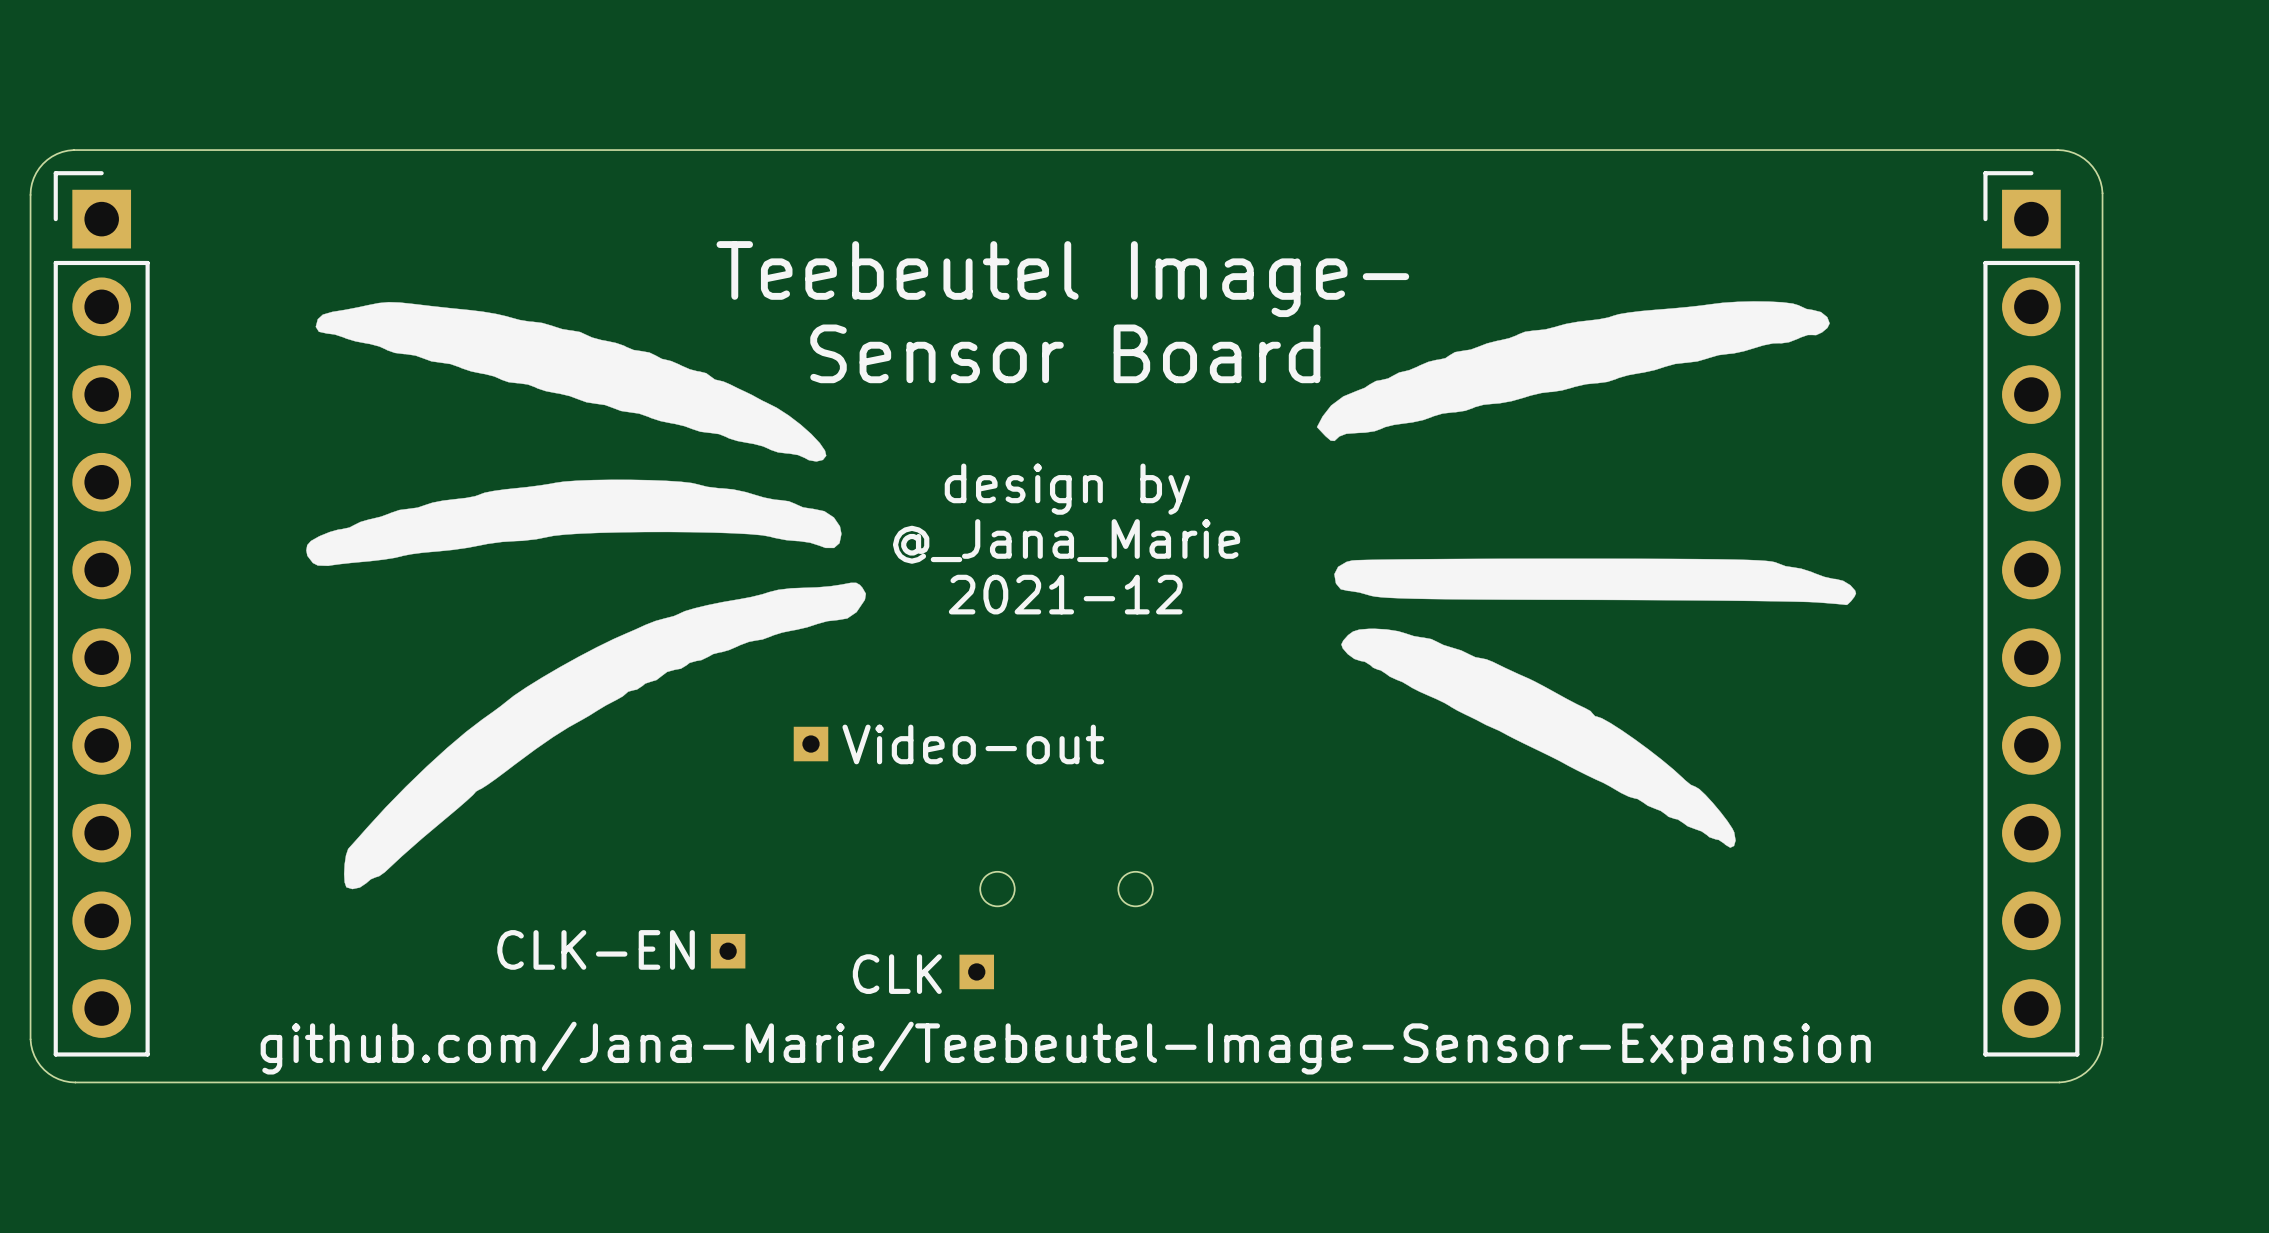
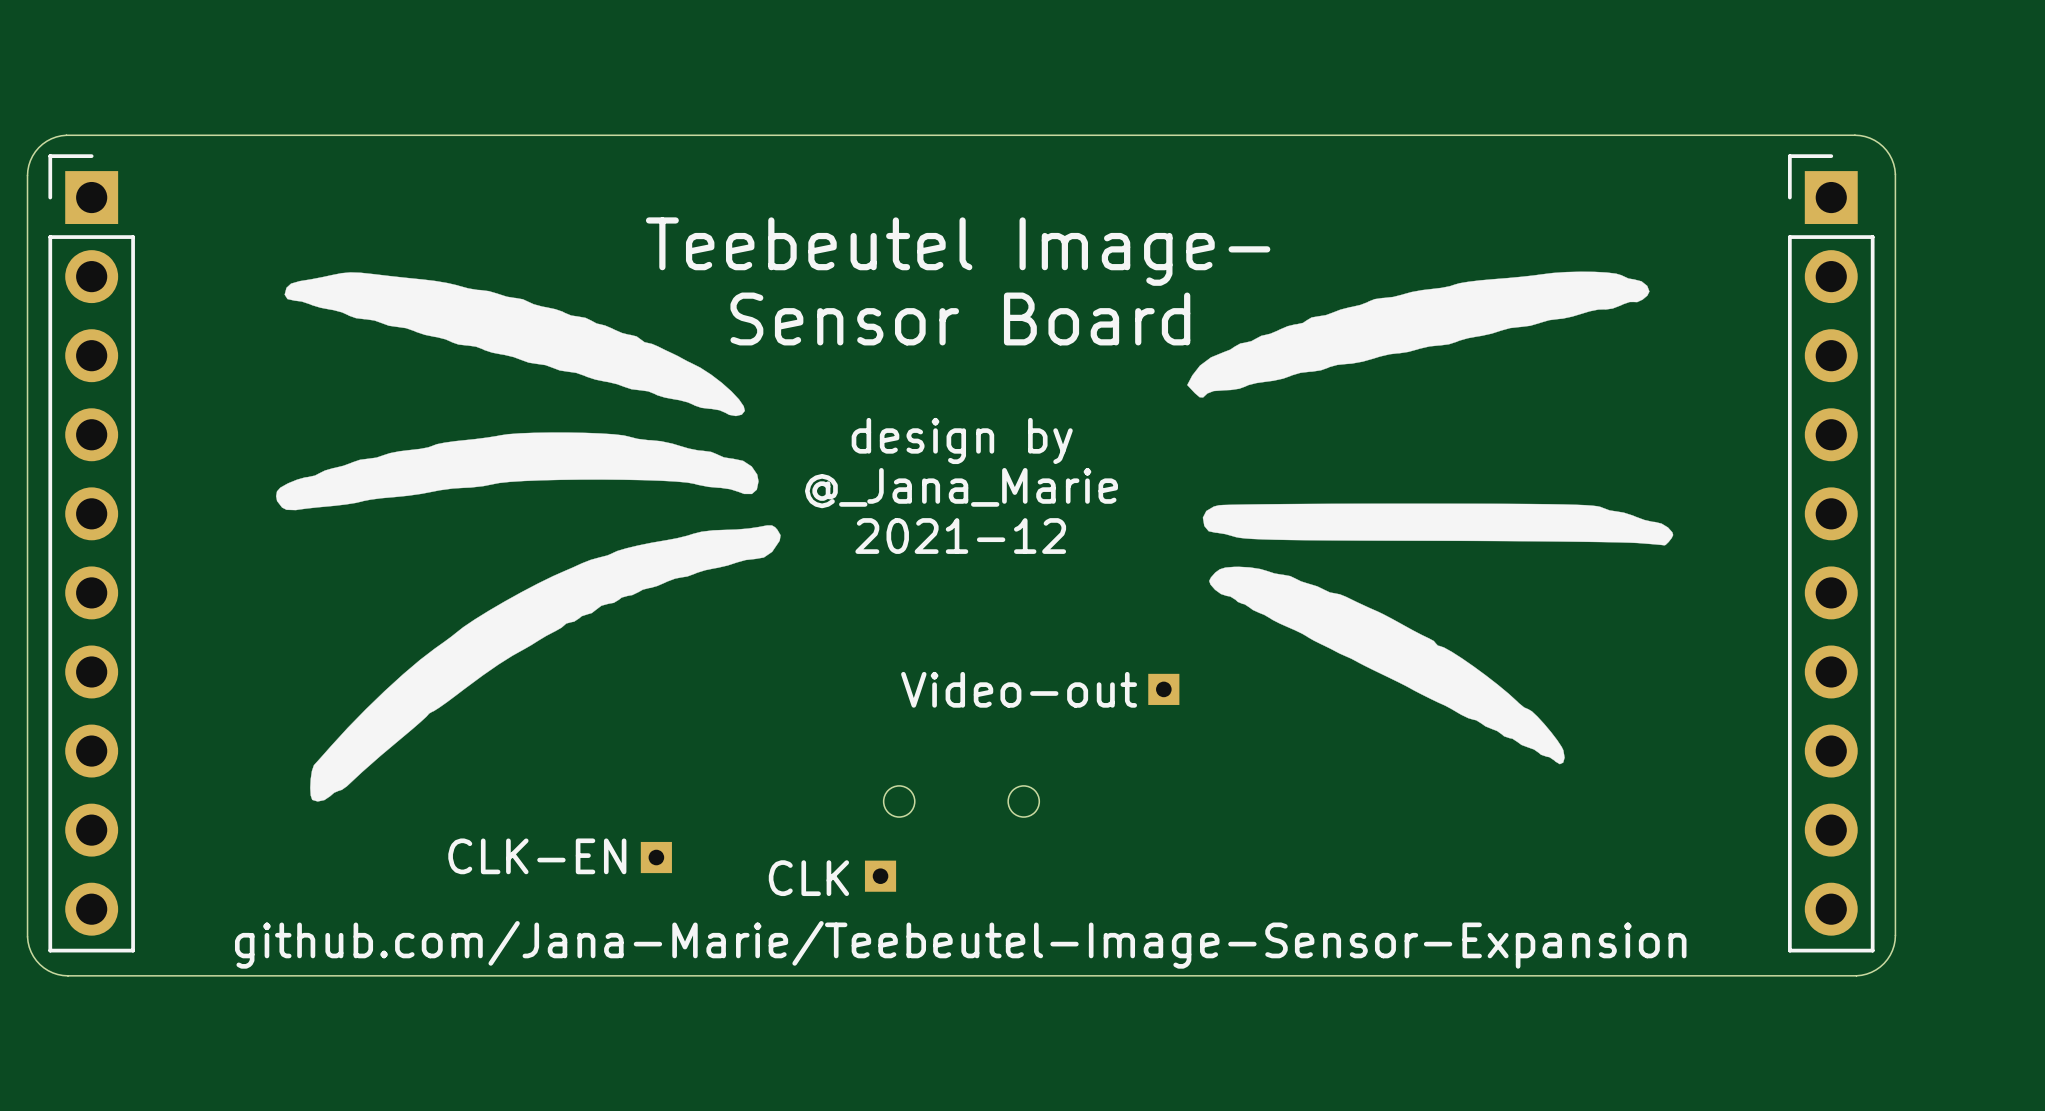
part position: (810, 744) -> (1163, 689)
text position: Video-out (973, 744) -> Video-out (1019, 689)

